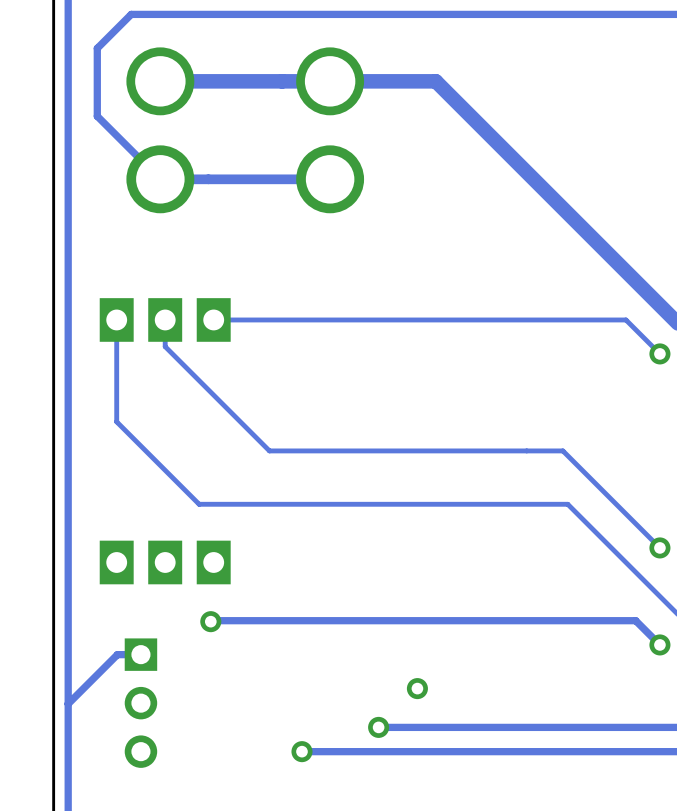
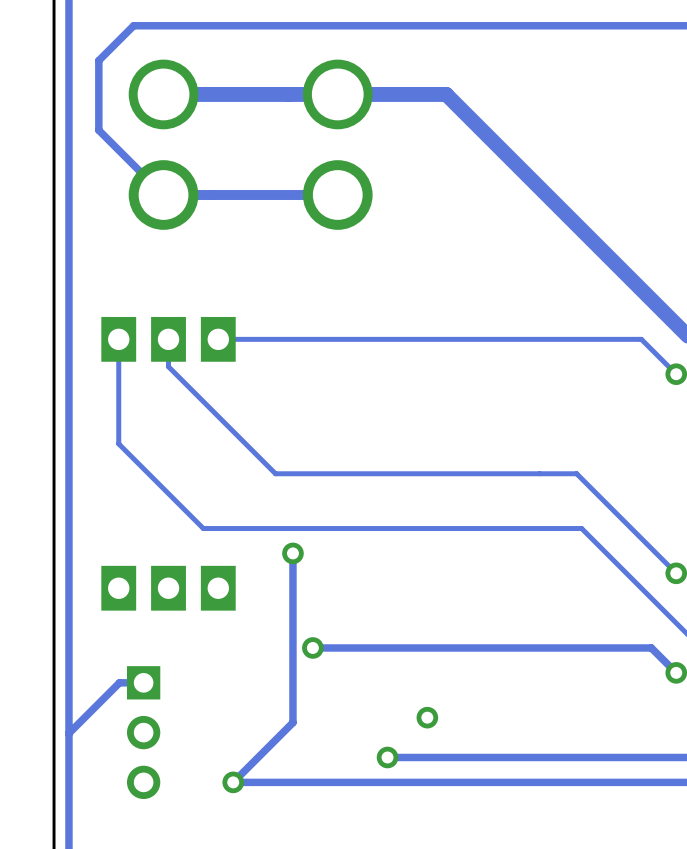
track: none -> (292, 553) (292, 722) (233, 782) (308, 782)
via: none -> (292, 553)
track: (305, 620) (210, 621) -> none
via: none -> (312, 647)
via: (210, 621) -> none
via: none -> (233, 782)
via: (301, 751) -> none

